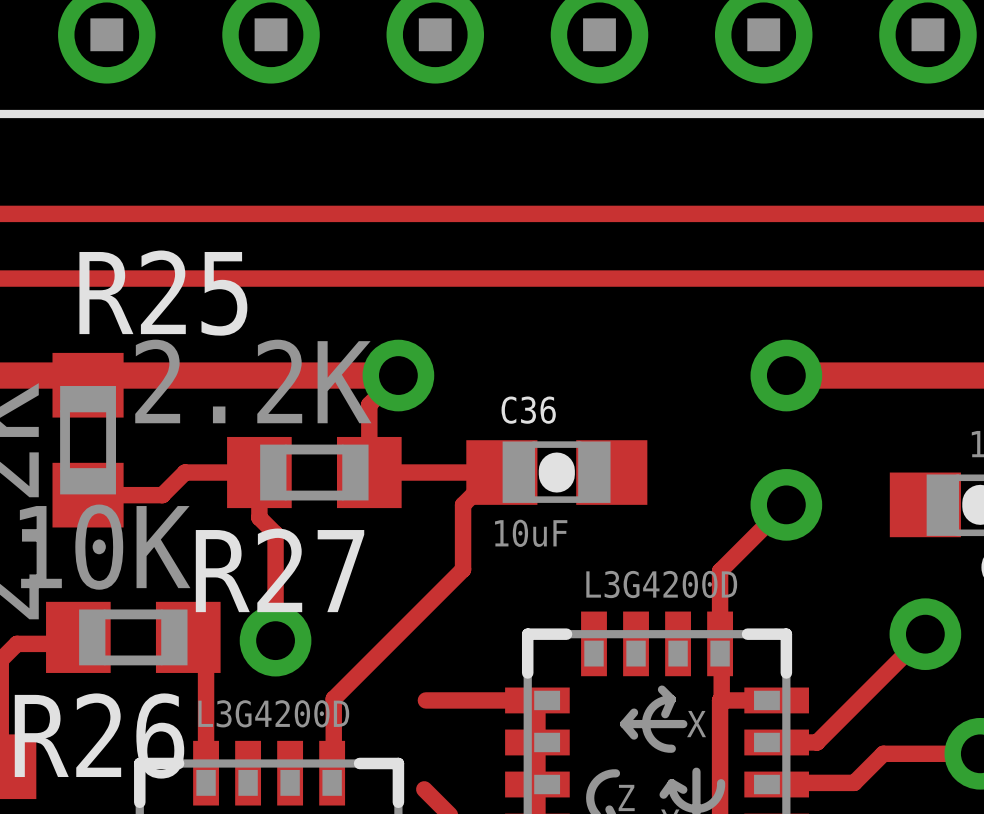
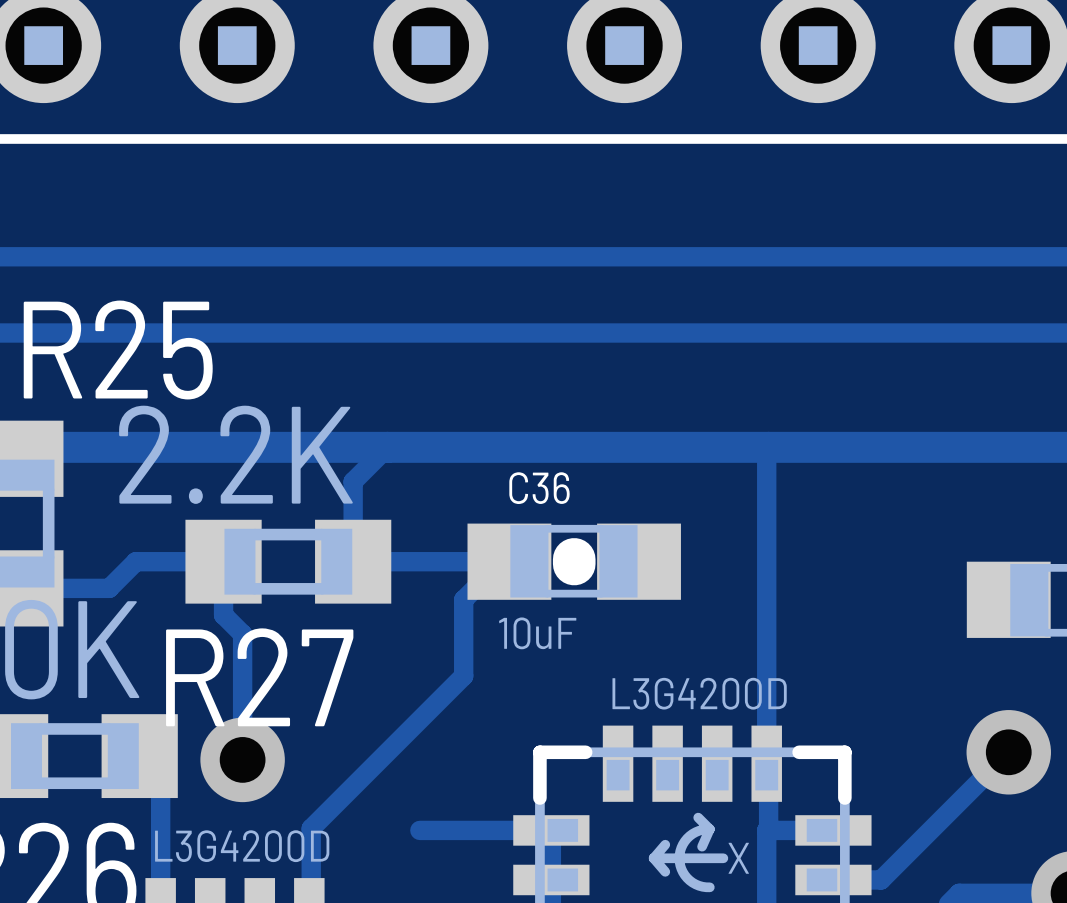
track: none -> (387, 447) (844, 447)
via: (398, 375) -> none
via: (786, 375) -> none
track: (786, 504) (720, 571) -> (768, 447) (766, 449) (766, 677)
via: (786, 504) -> none

